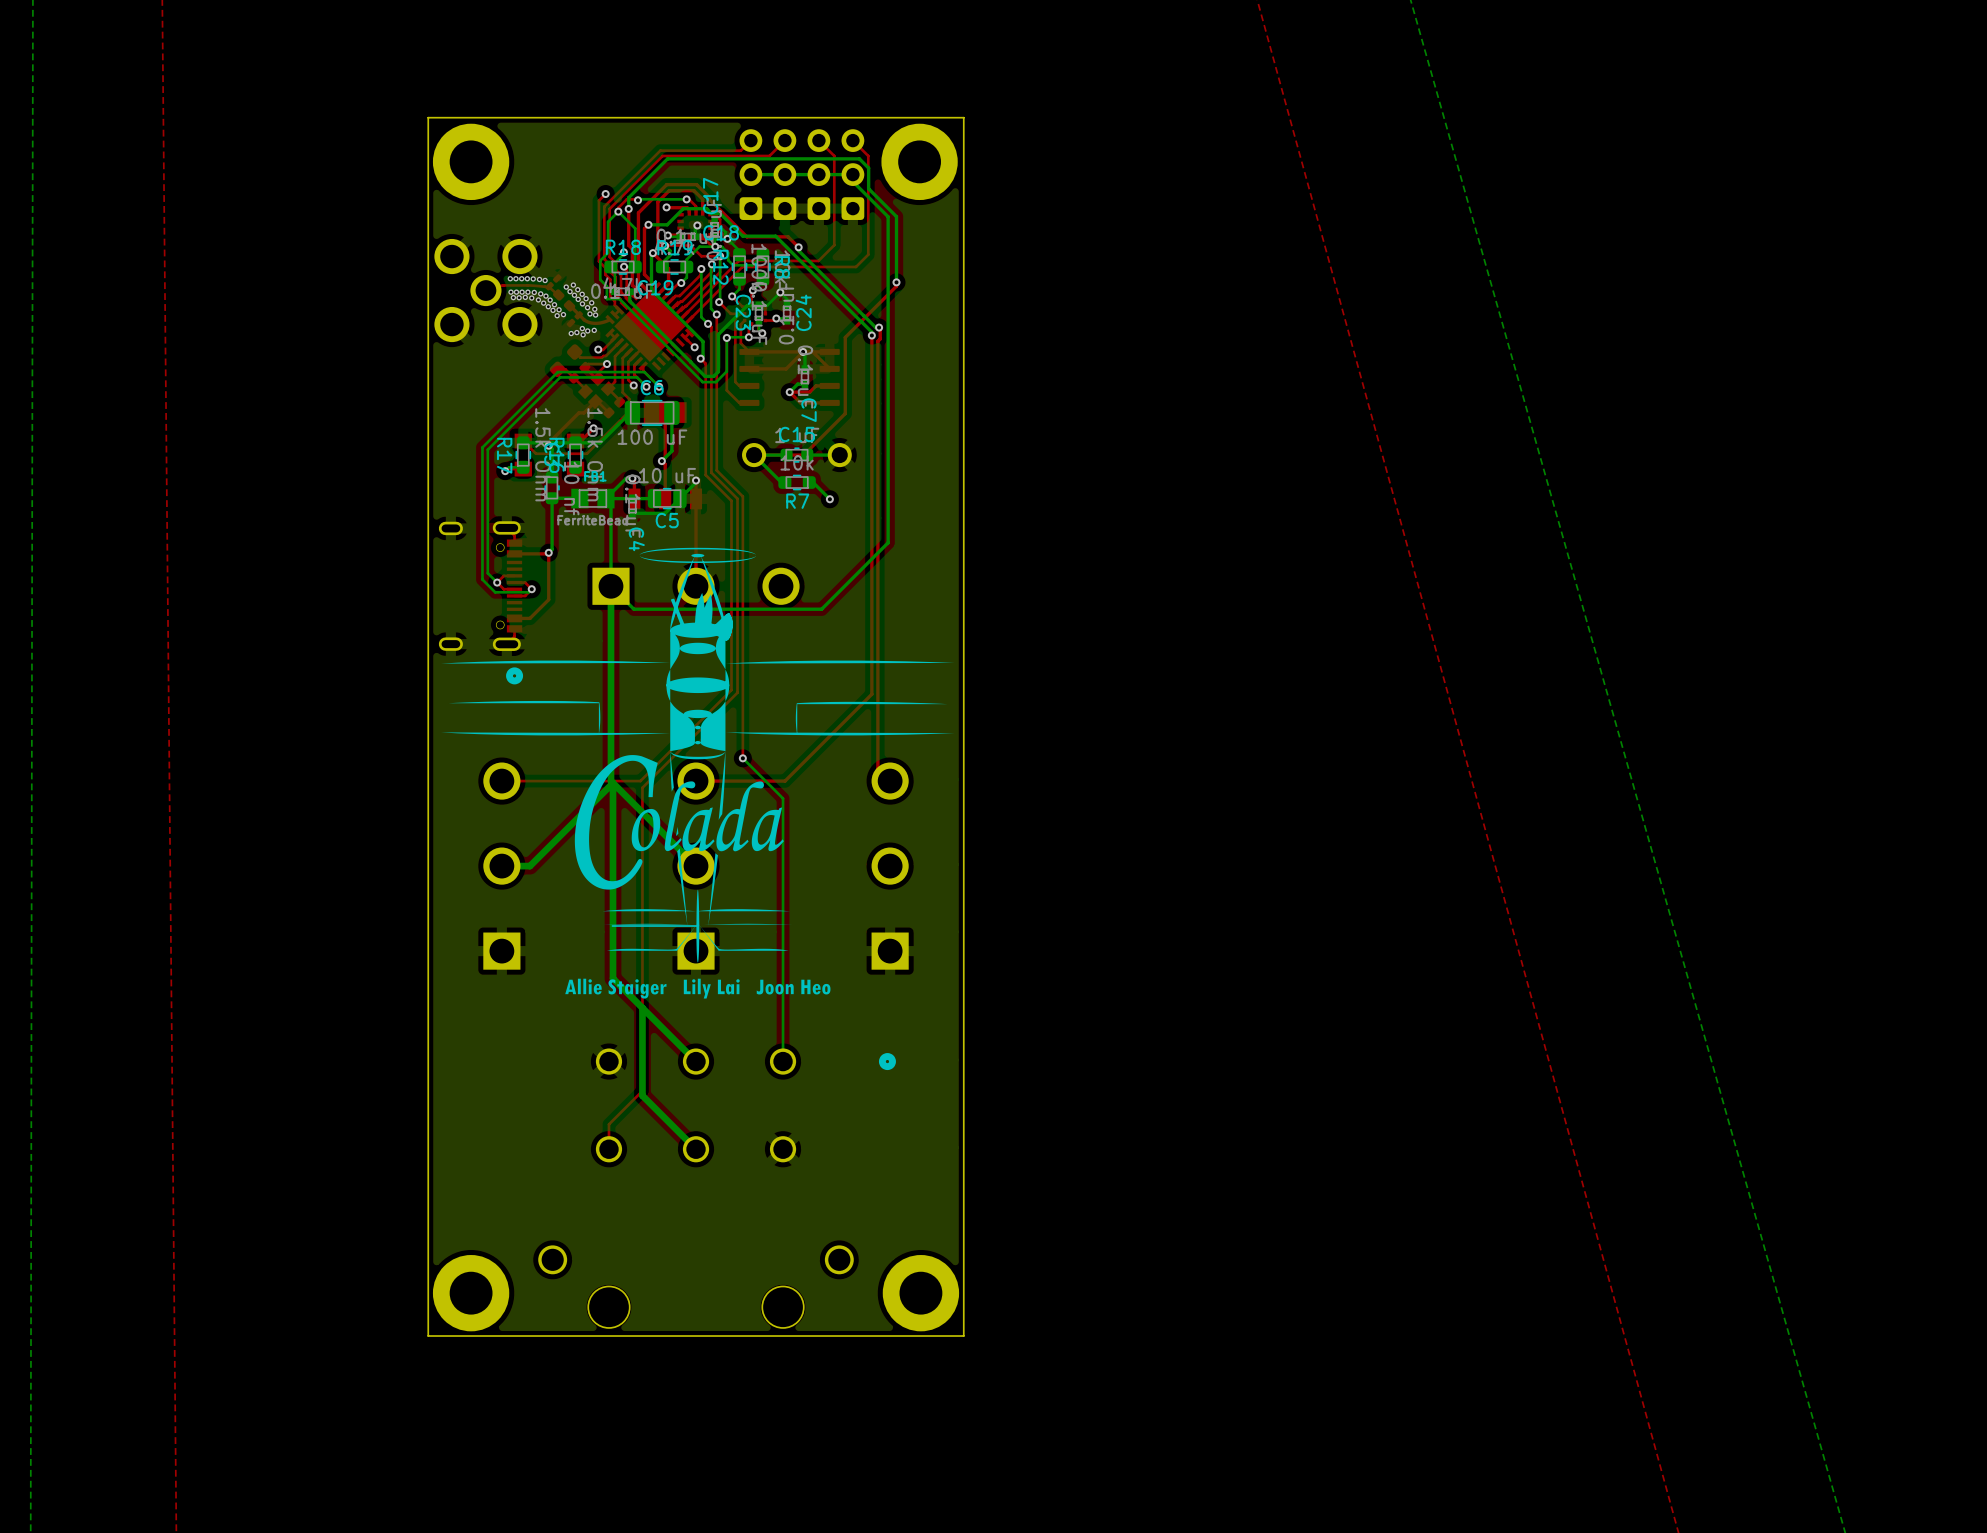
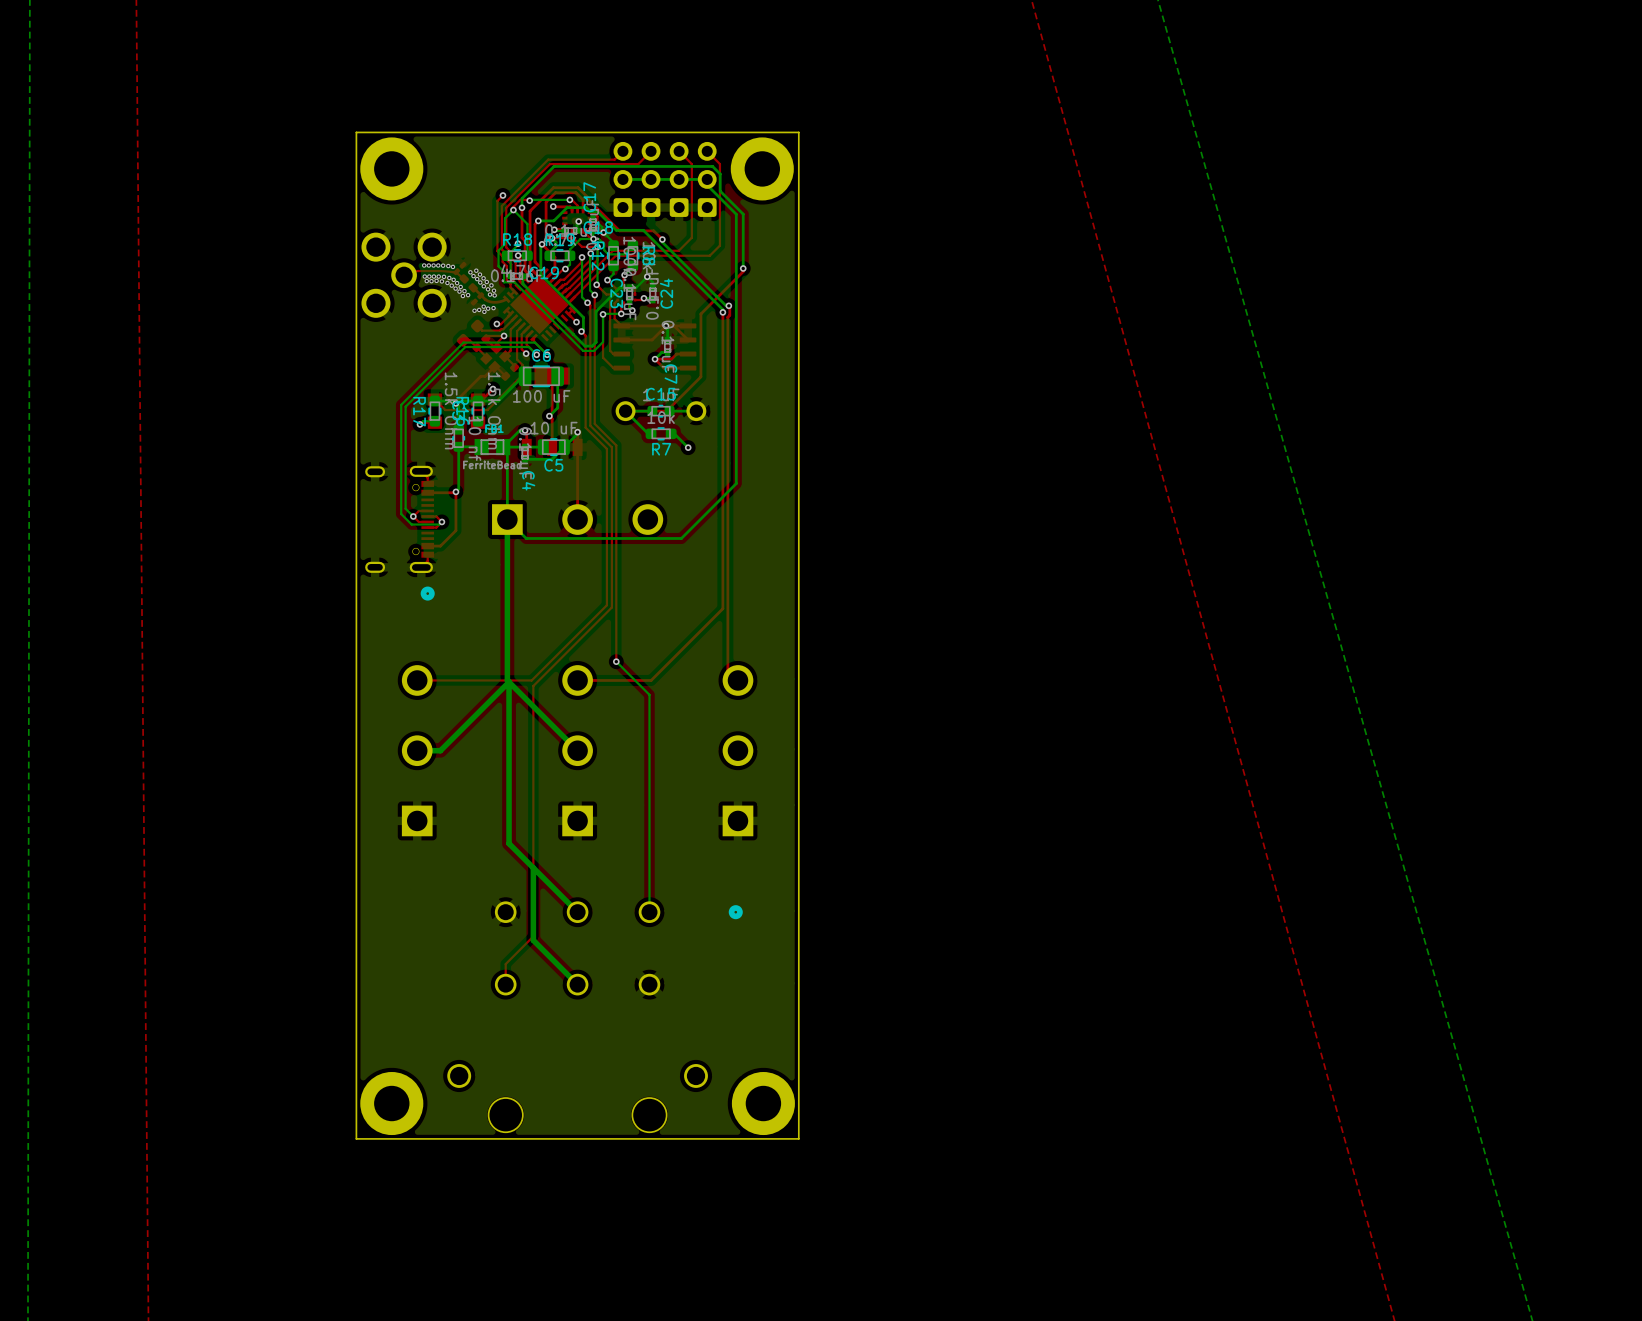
drawing: [441, 547, 955, 963] -> none
line: (697, 926) (612, 926) -> none
drawing: [565, 978, 667, 999] -> none
drawing: [683, 978, 740, 999] -> none
drawing: [756, 979, 831, 995] -> none

